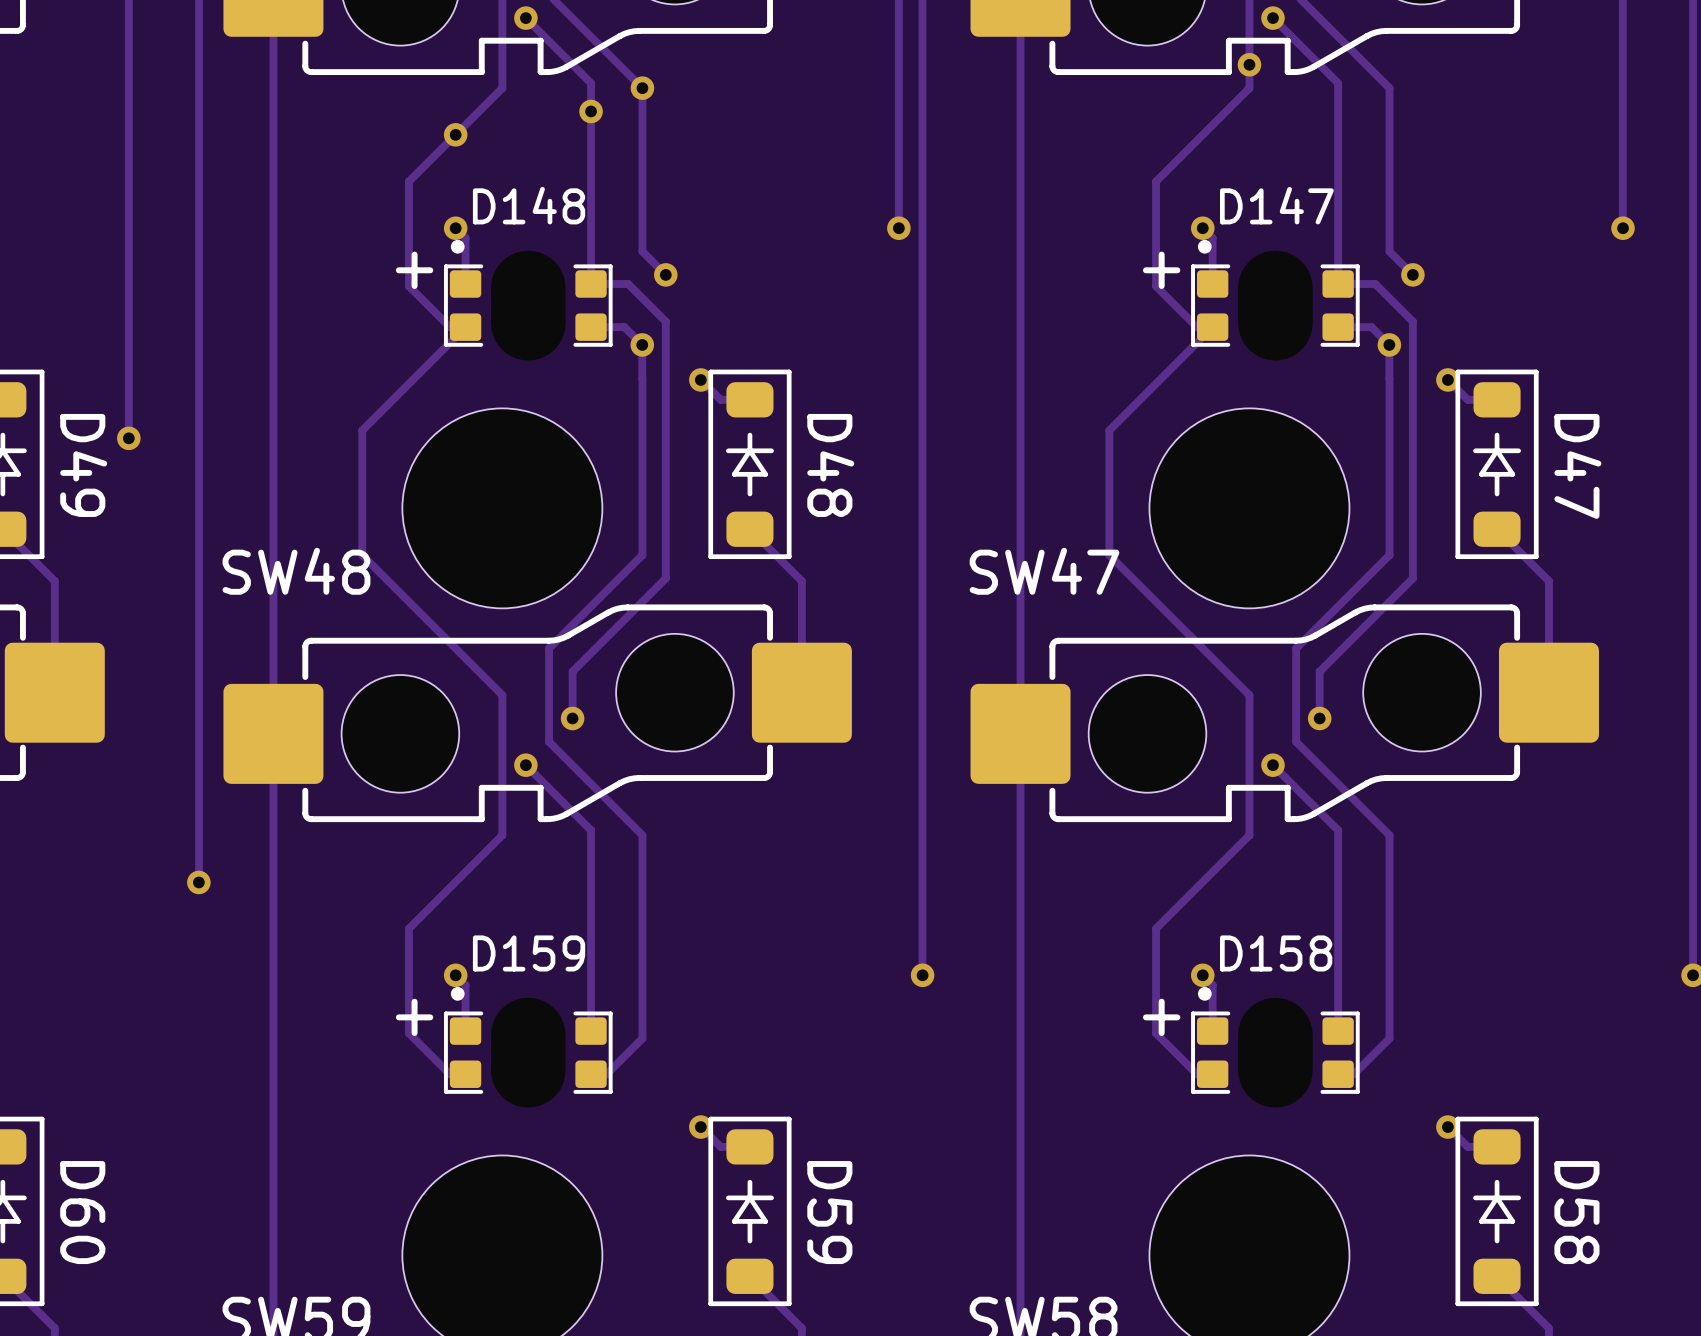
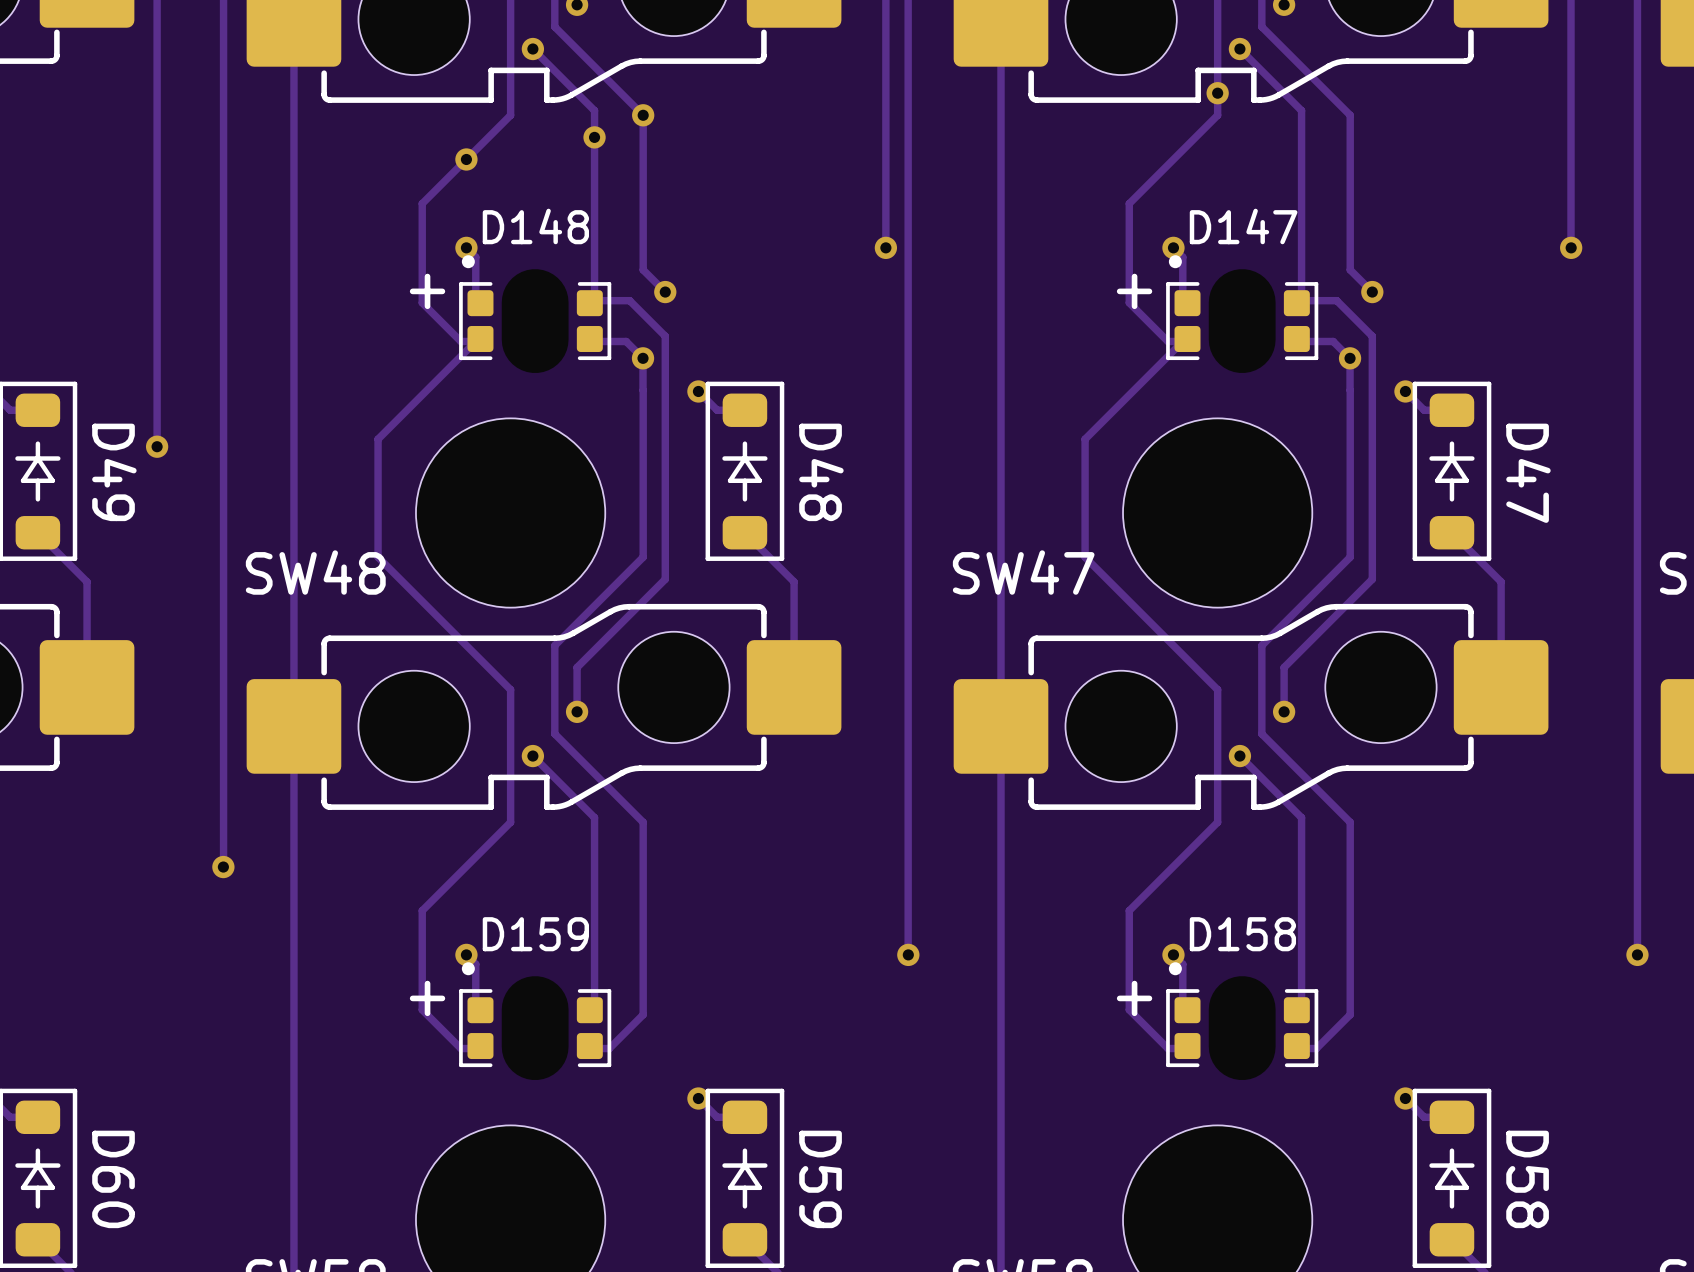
D148 footprint: [395, 239, 613, 361] -> [409, 255, 612, 374]
D147 footprint: [1142, 239, 1360, 361] -> [1116, 255, 1319, 374]
D159 footprint: [395, 986, 613, 1108] -> [409, 962, 612, 1081]
D158 footprint: [1142, 986, 1360, 1108] -> [1116, 962, 1319, 1081]

